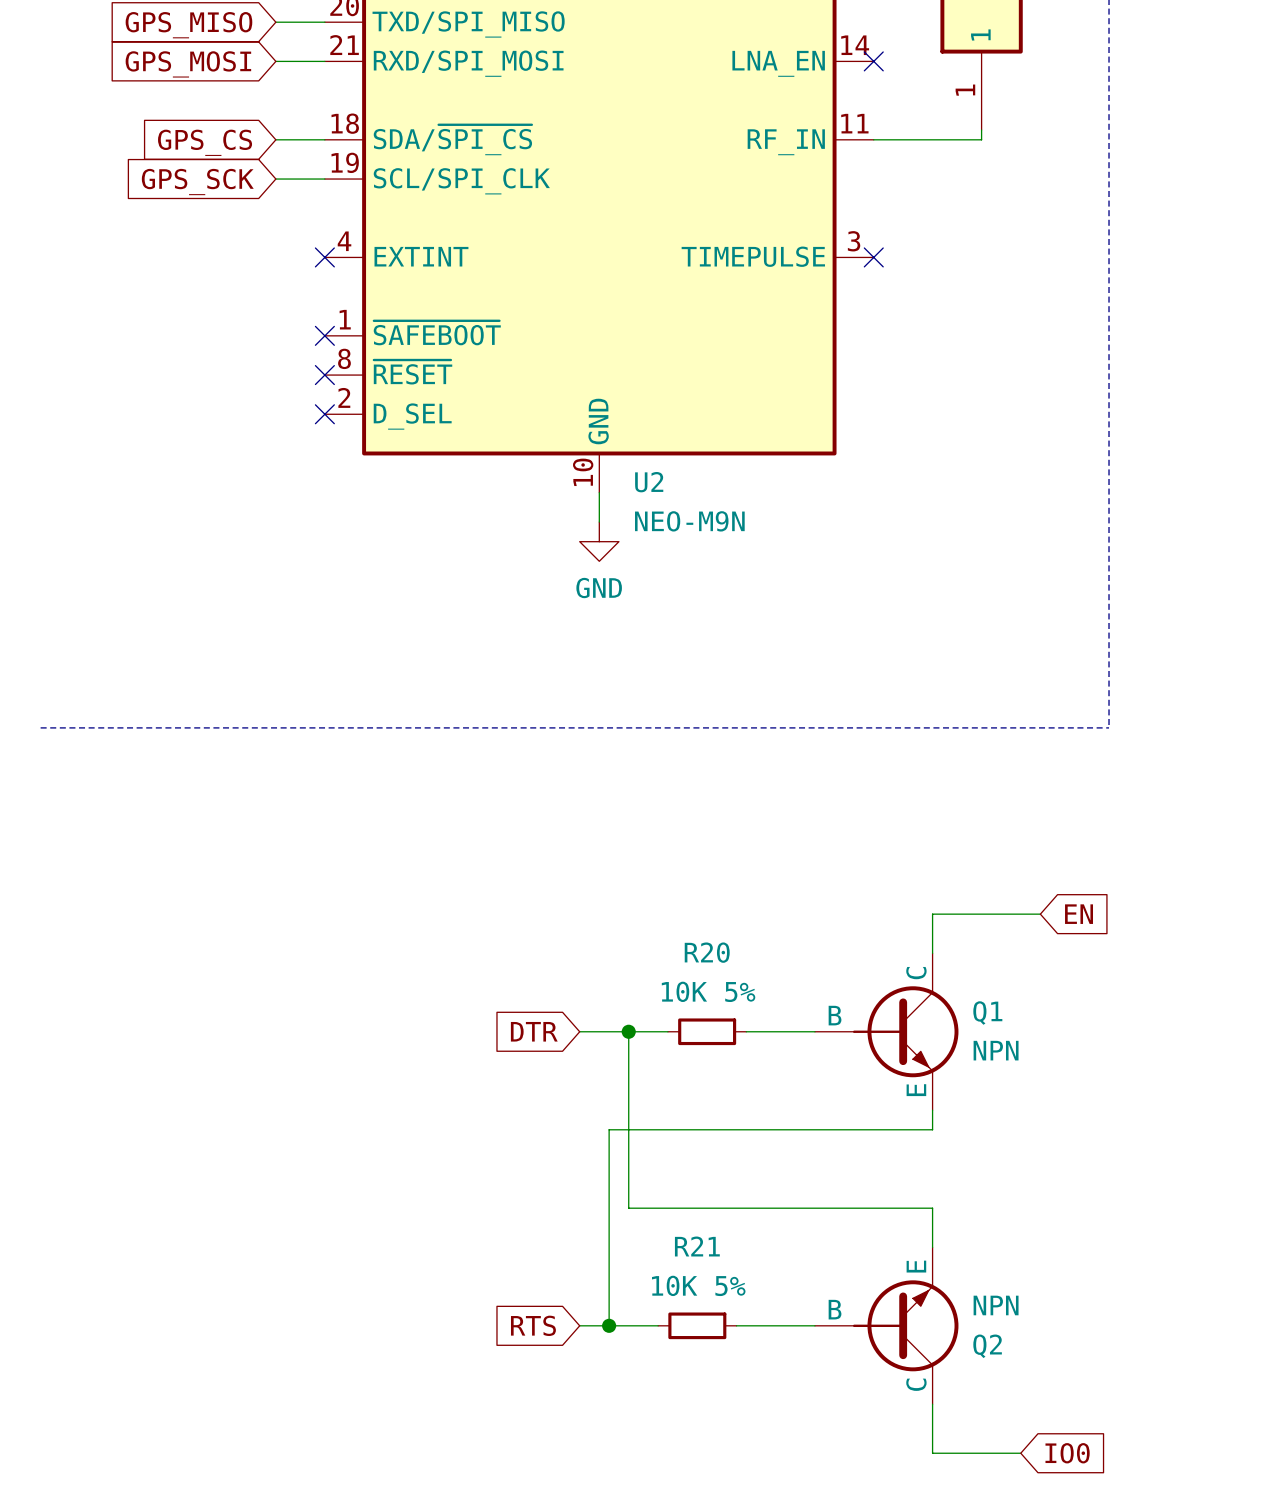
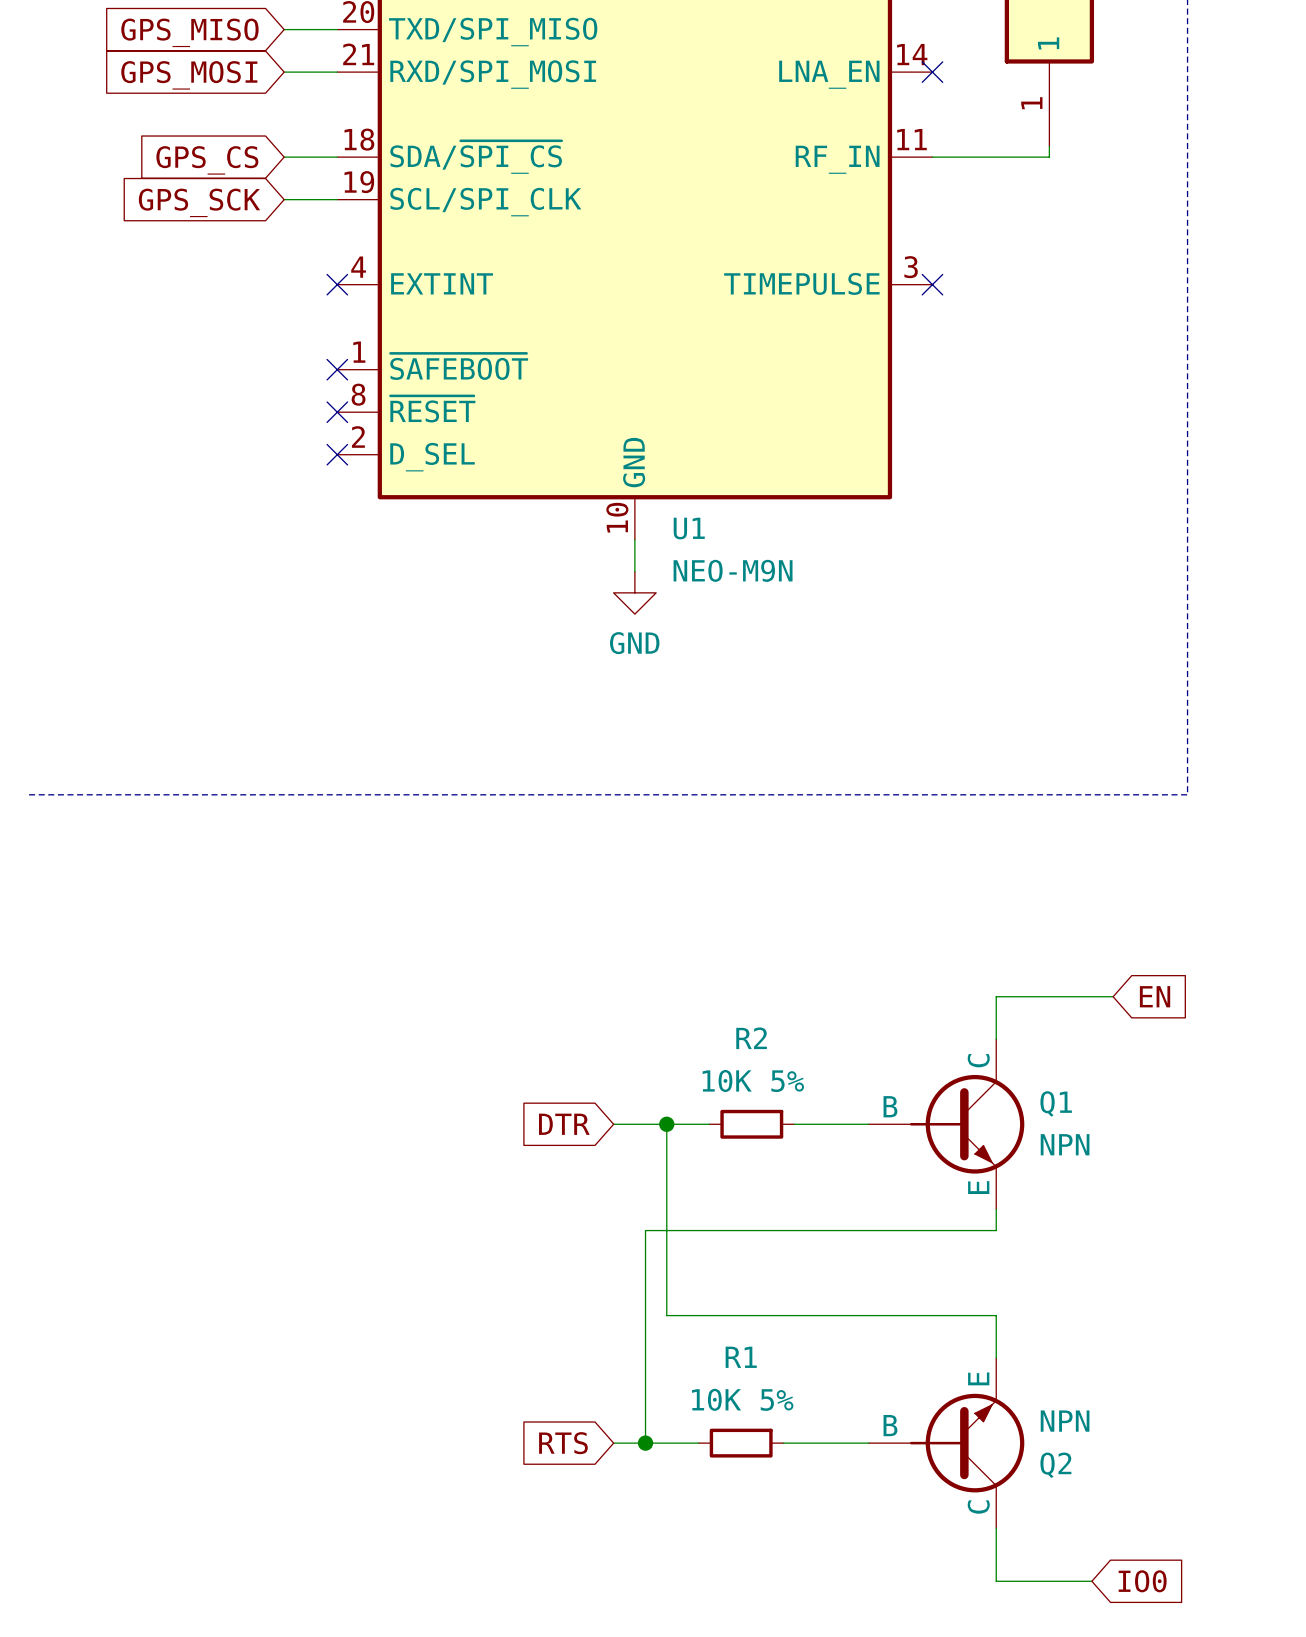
U2 name: U2 (649, 482) -> U1 (689, 528)
R20 name: R20 (707, 952) -> R2 (751, 1038)
R21 name: R21 (697, 1246) -> R1 (741, 1357)

